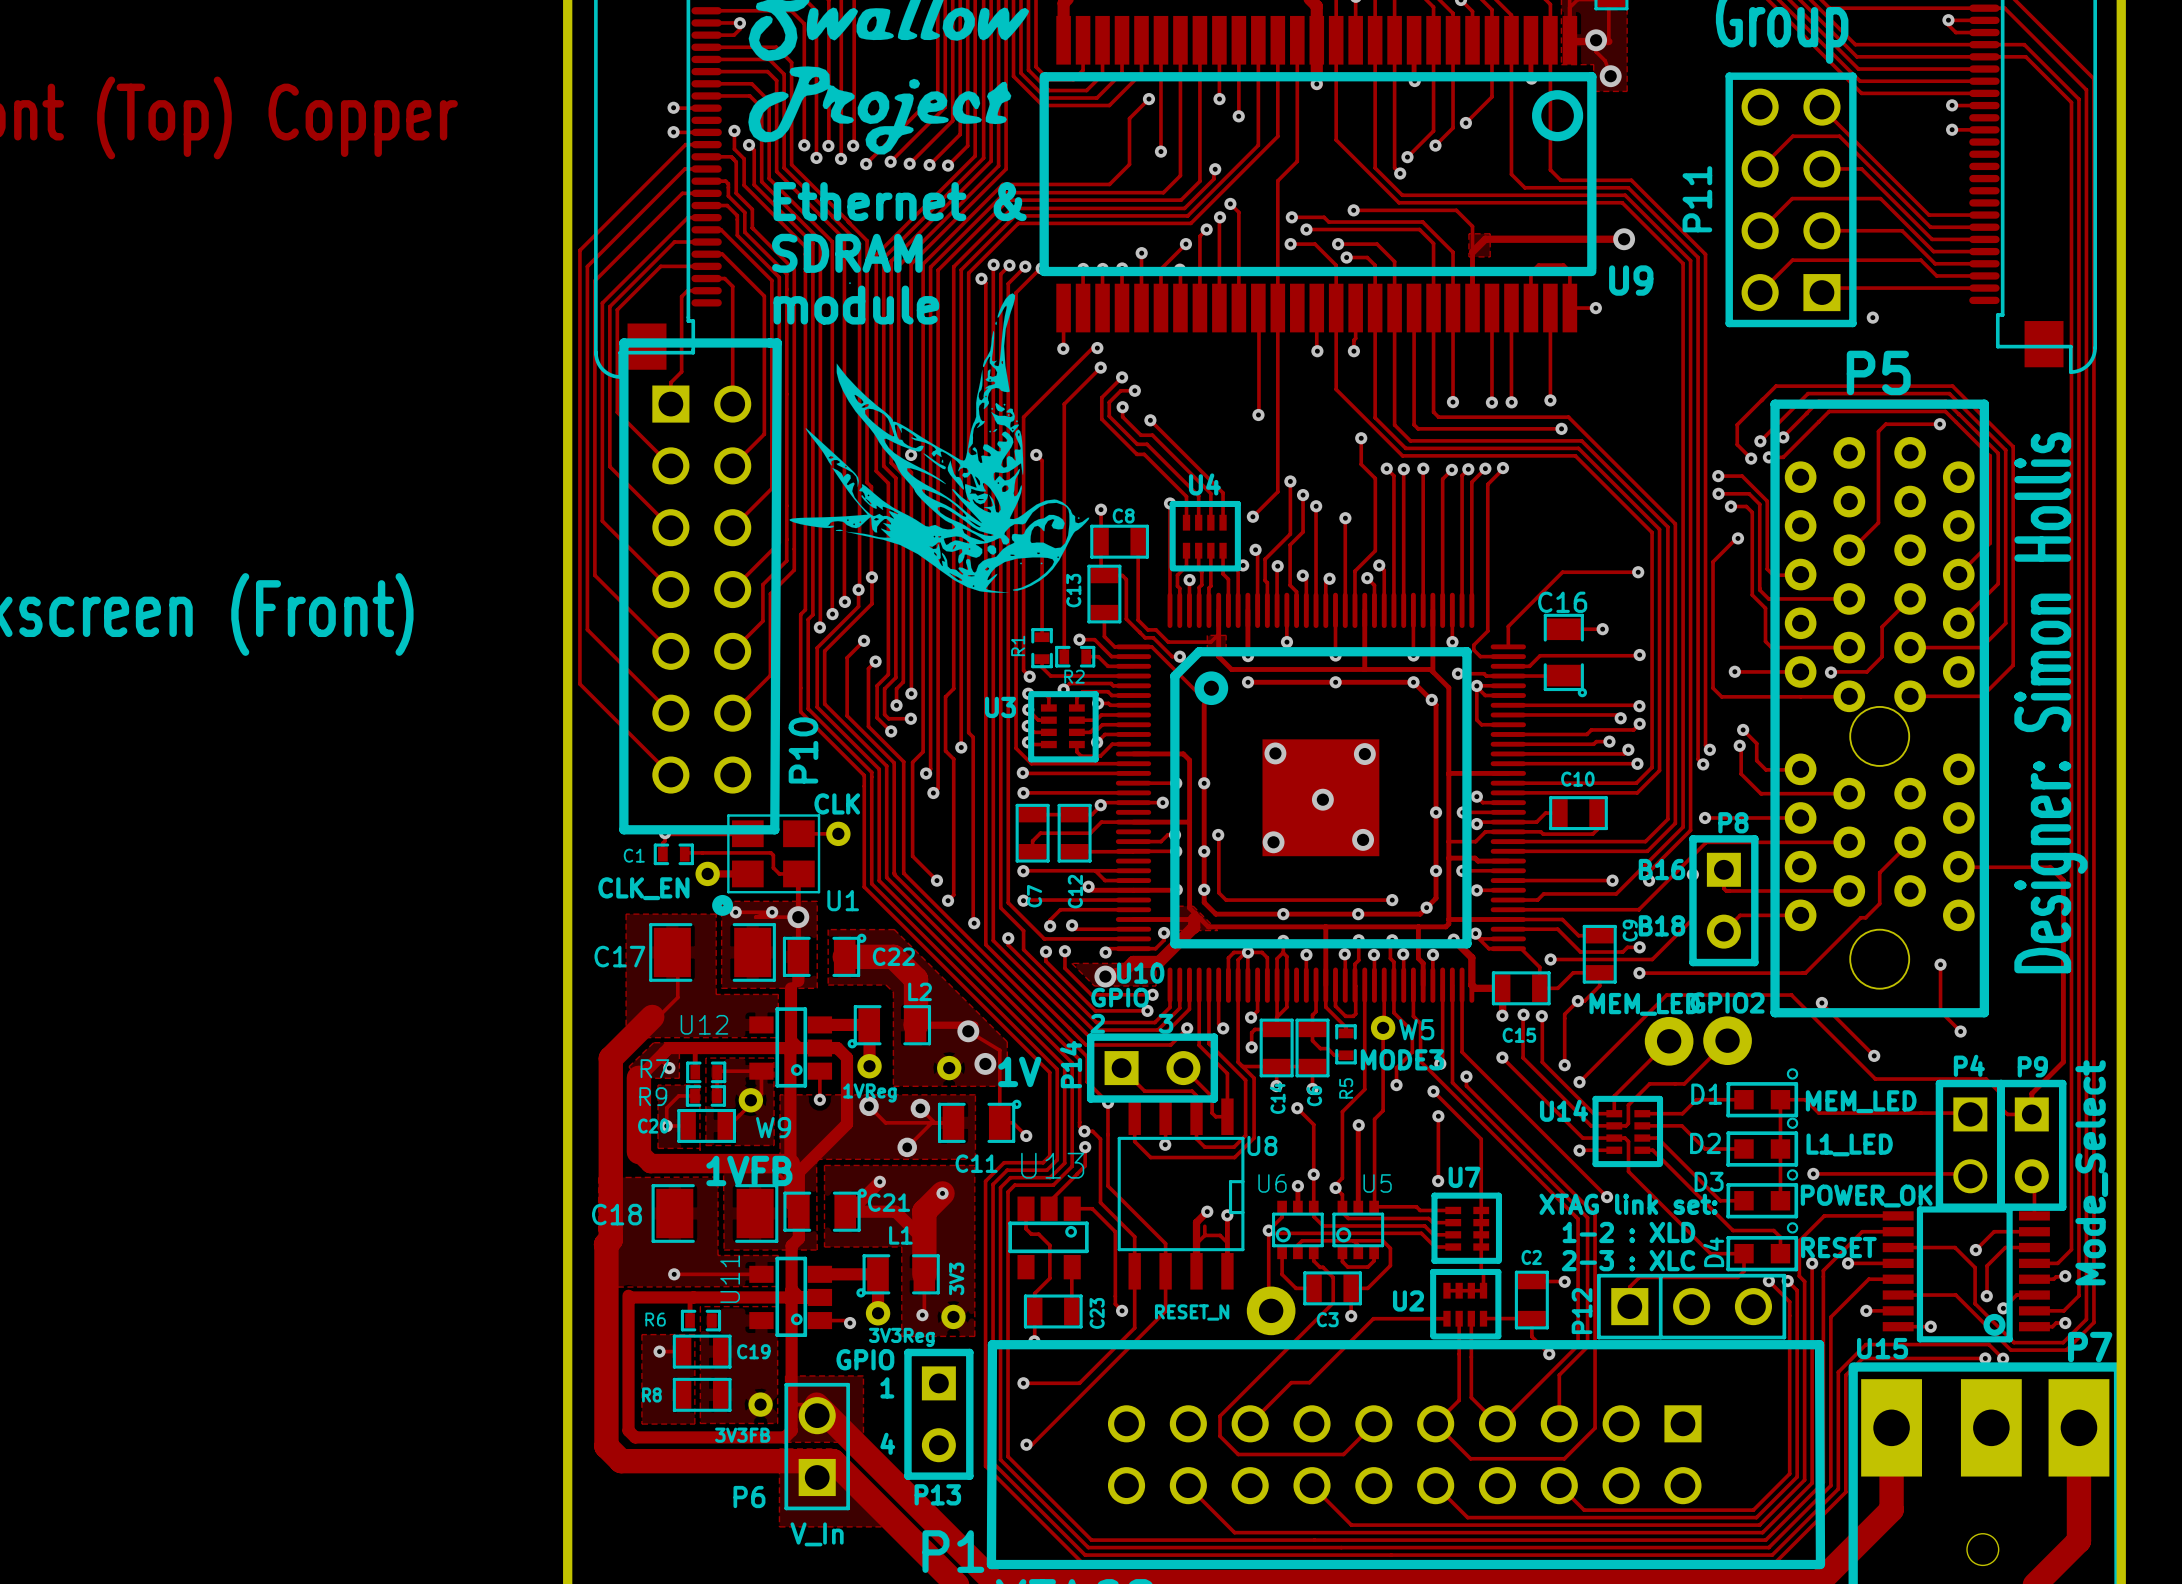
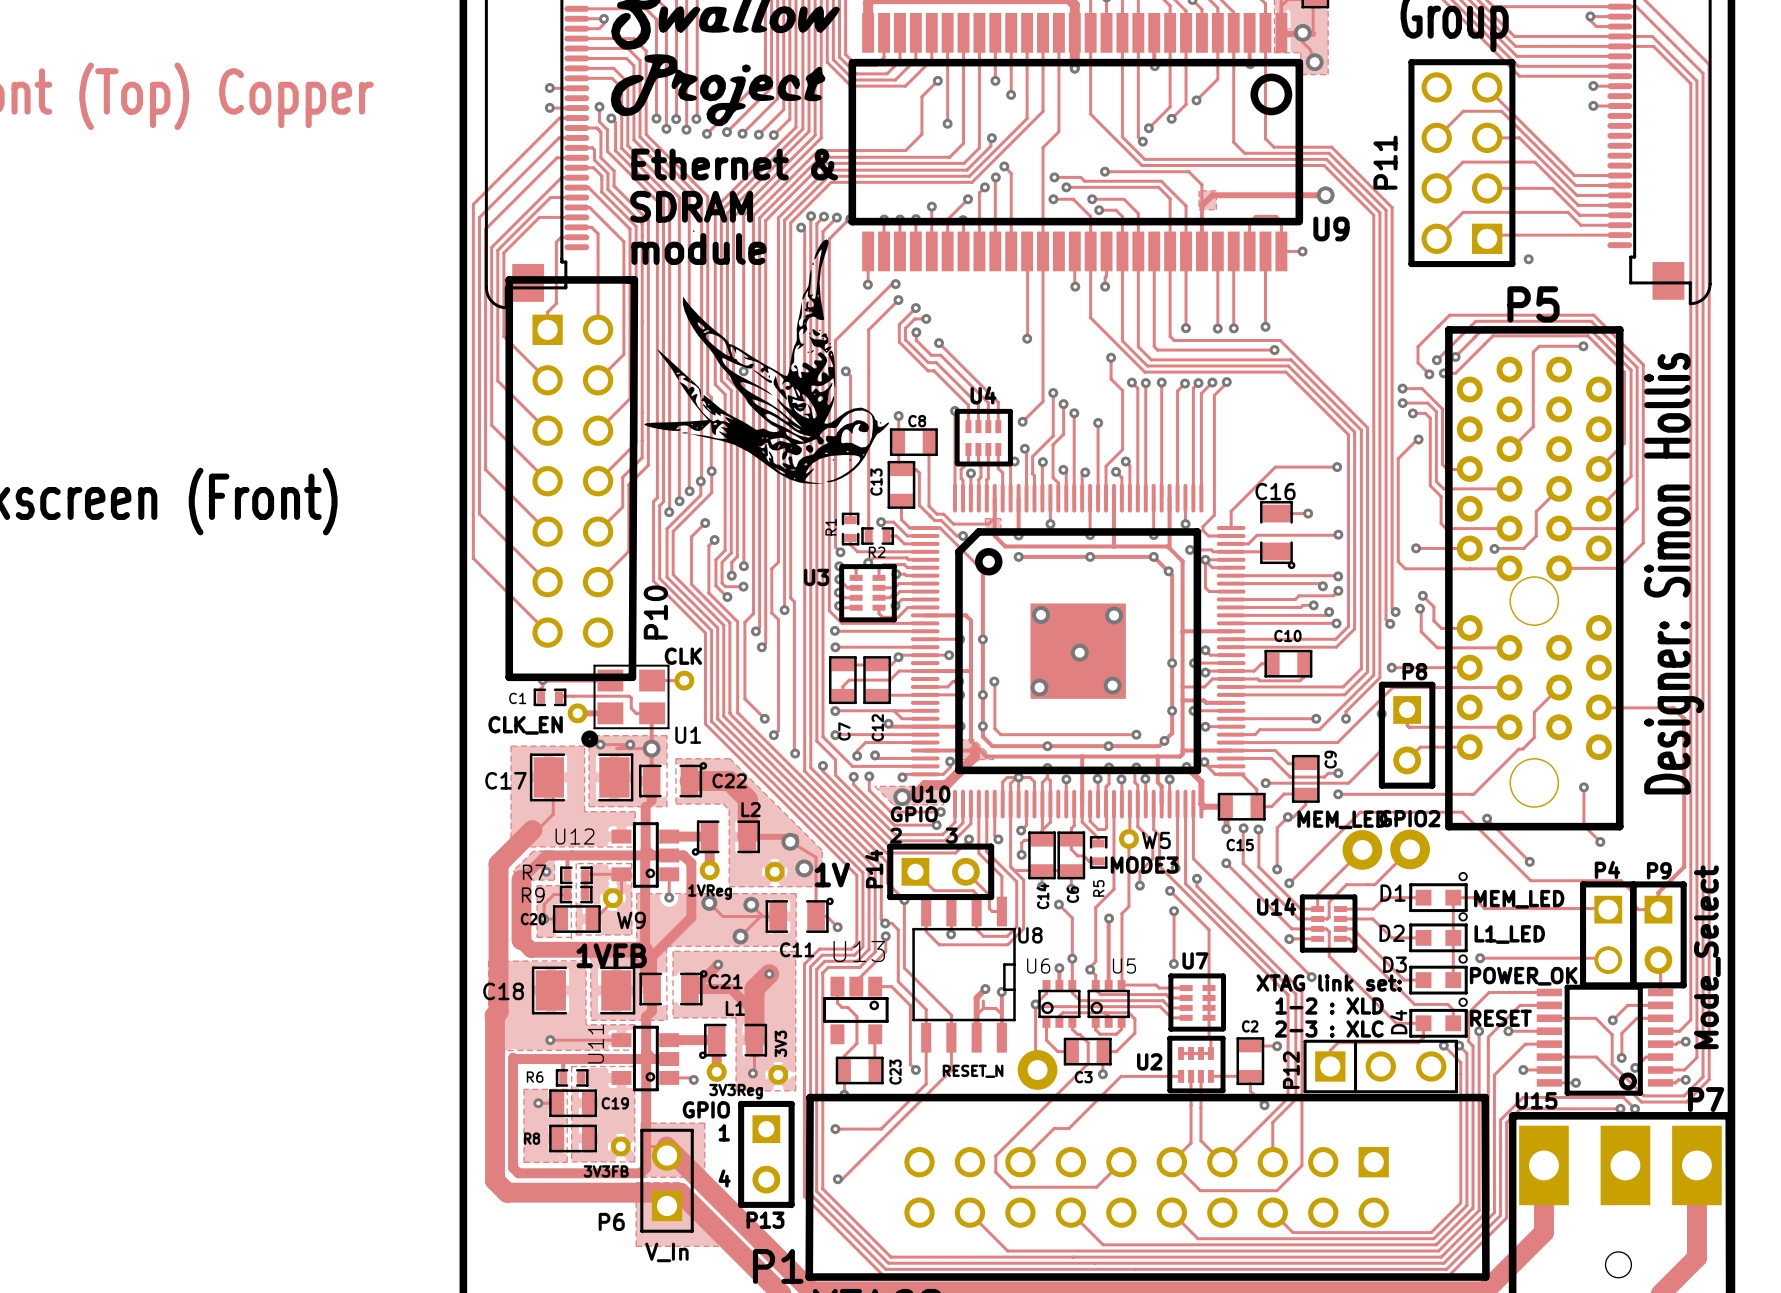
text: B16 (1661, 869) -> none
text: B18 (1661, 925) -> none

